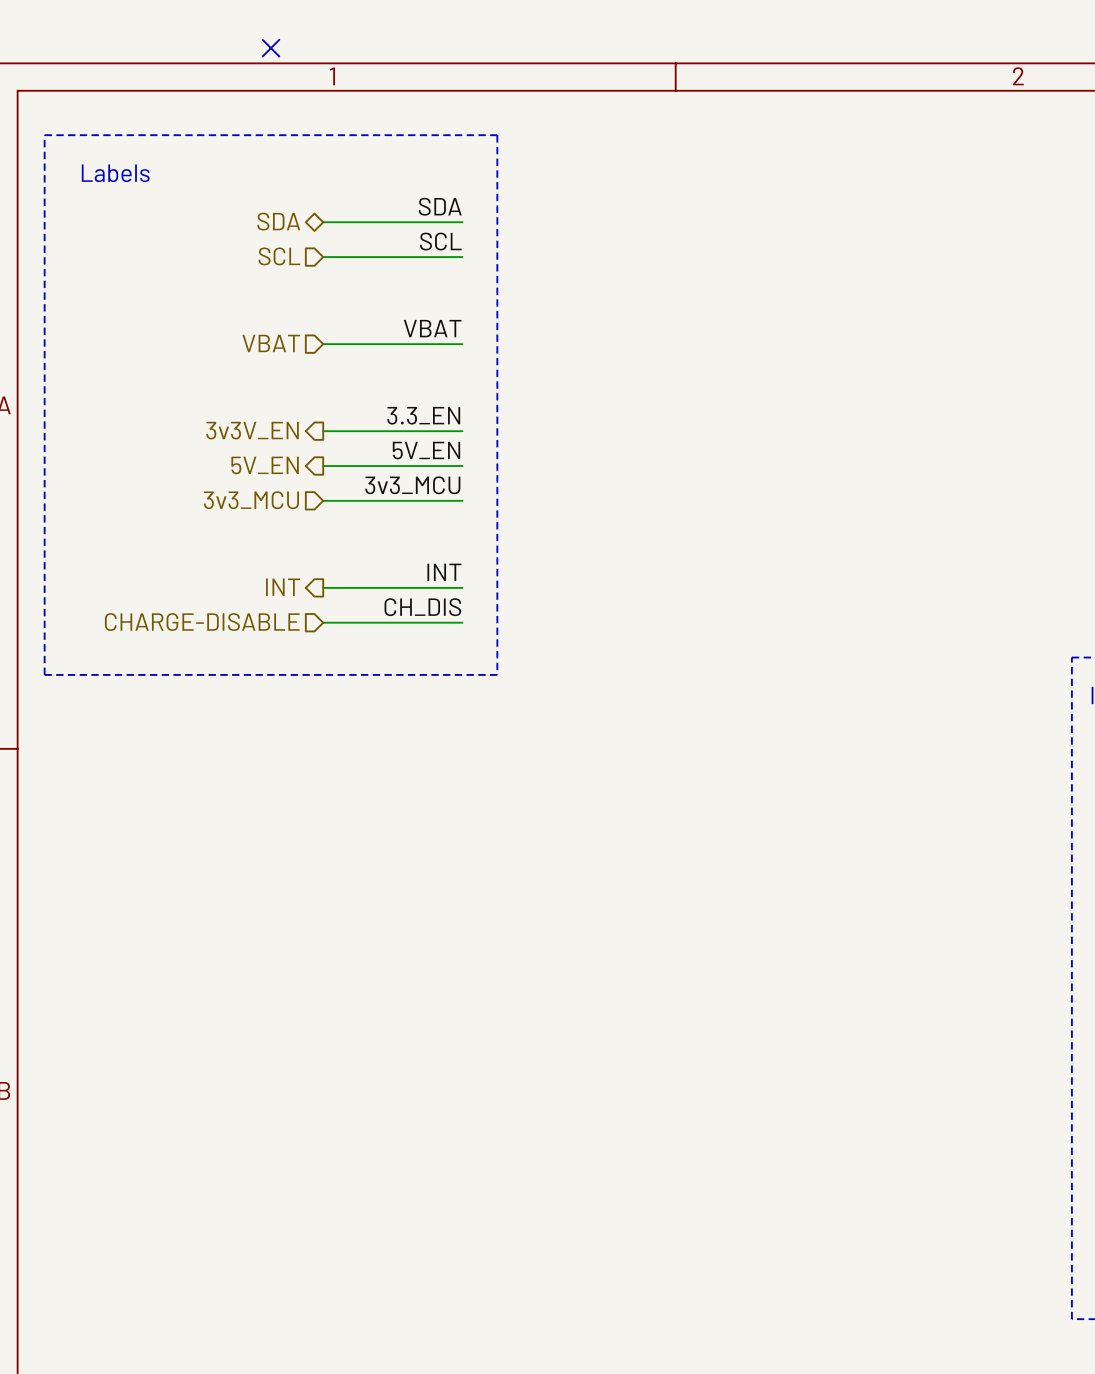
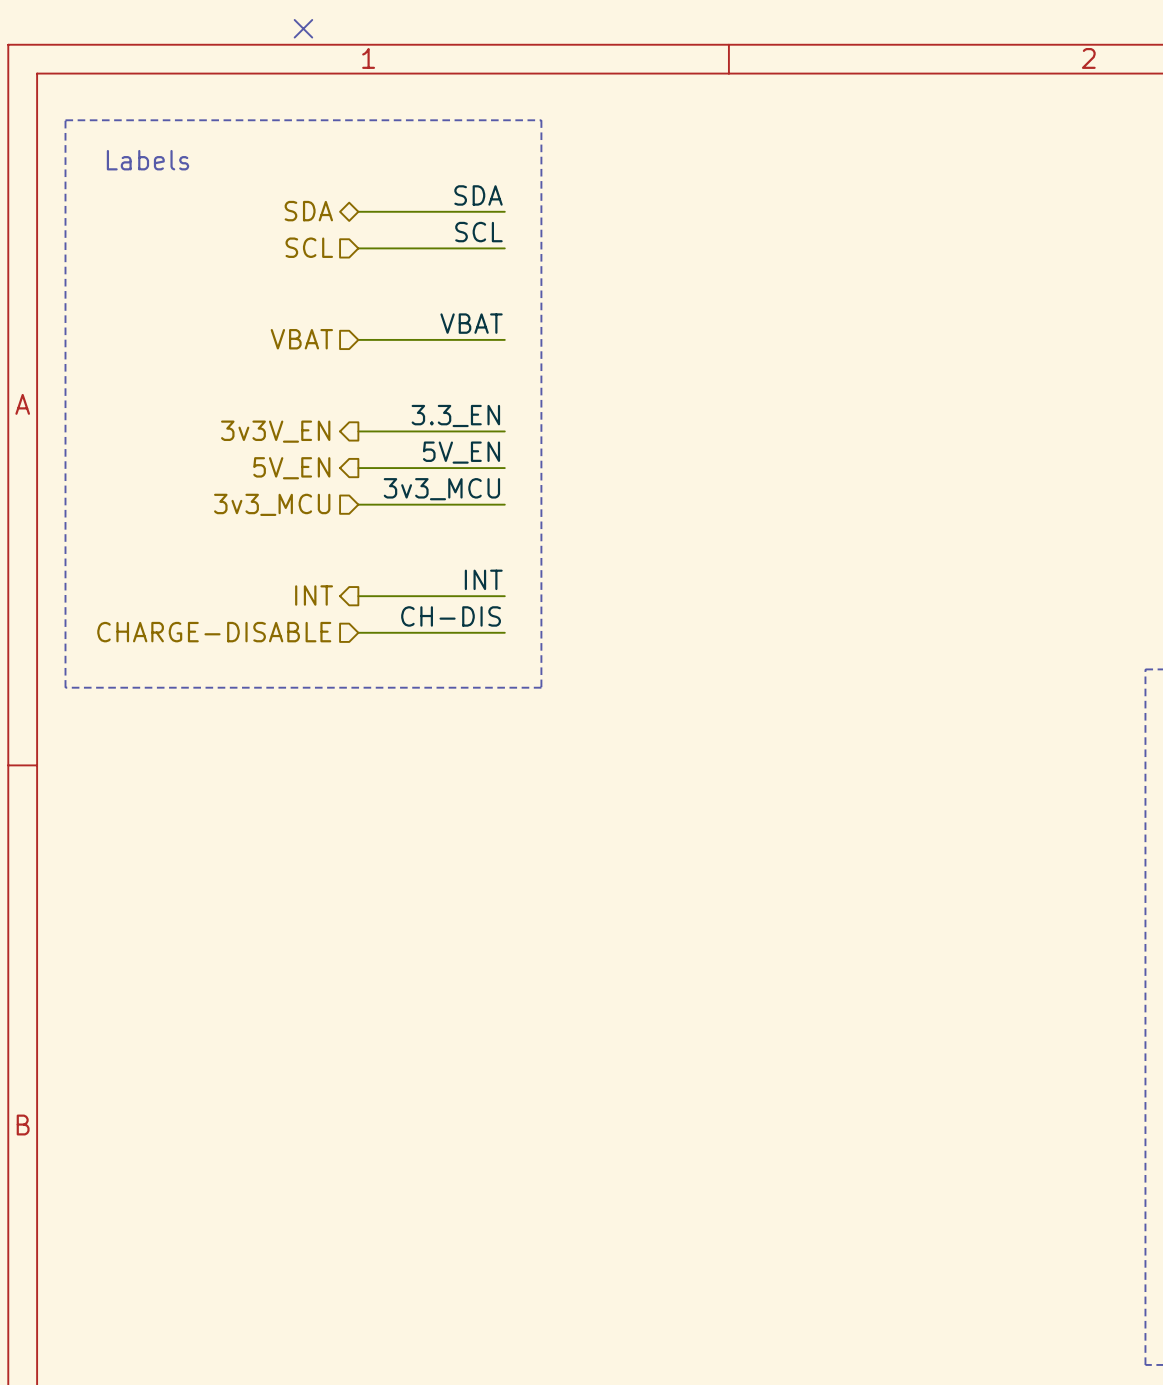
label: CH_DIS (422, 607) -> CH-DIS (451, 616)

